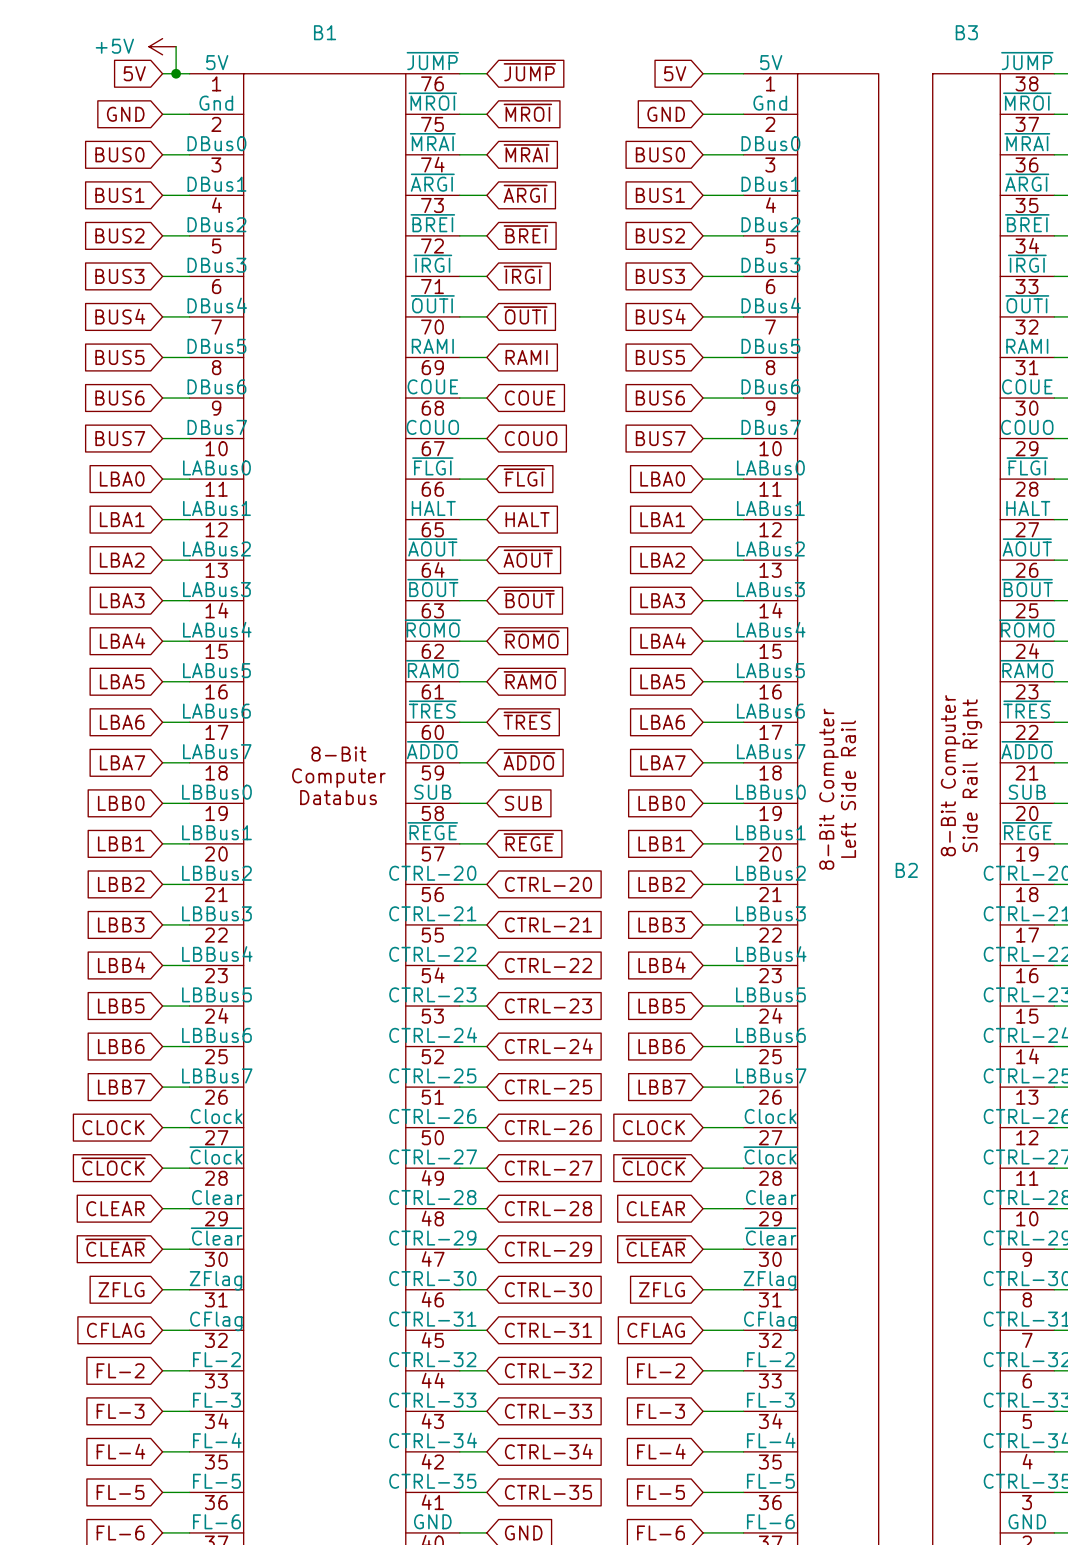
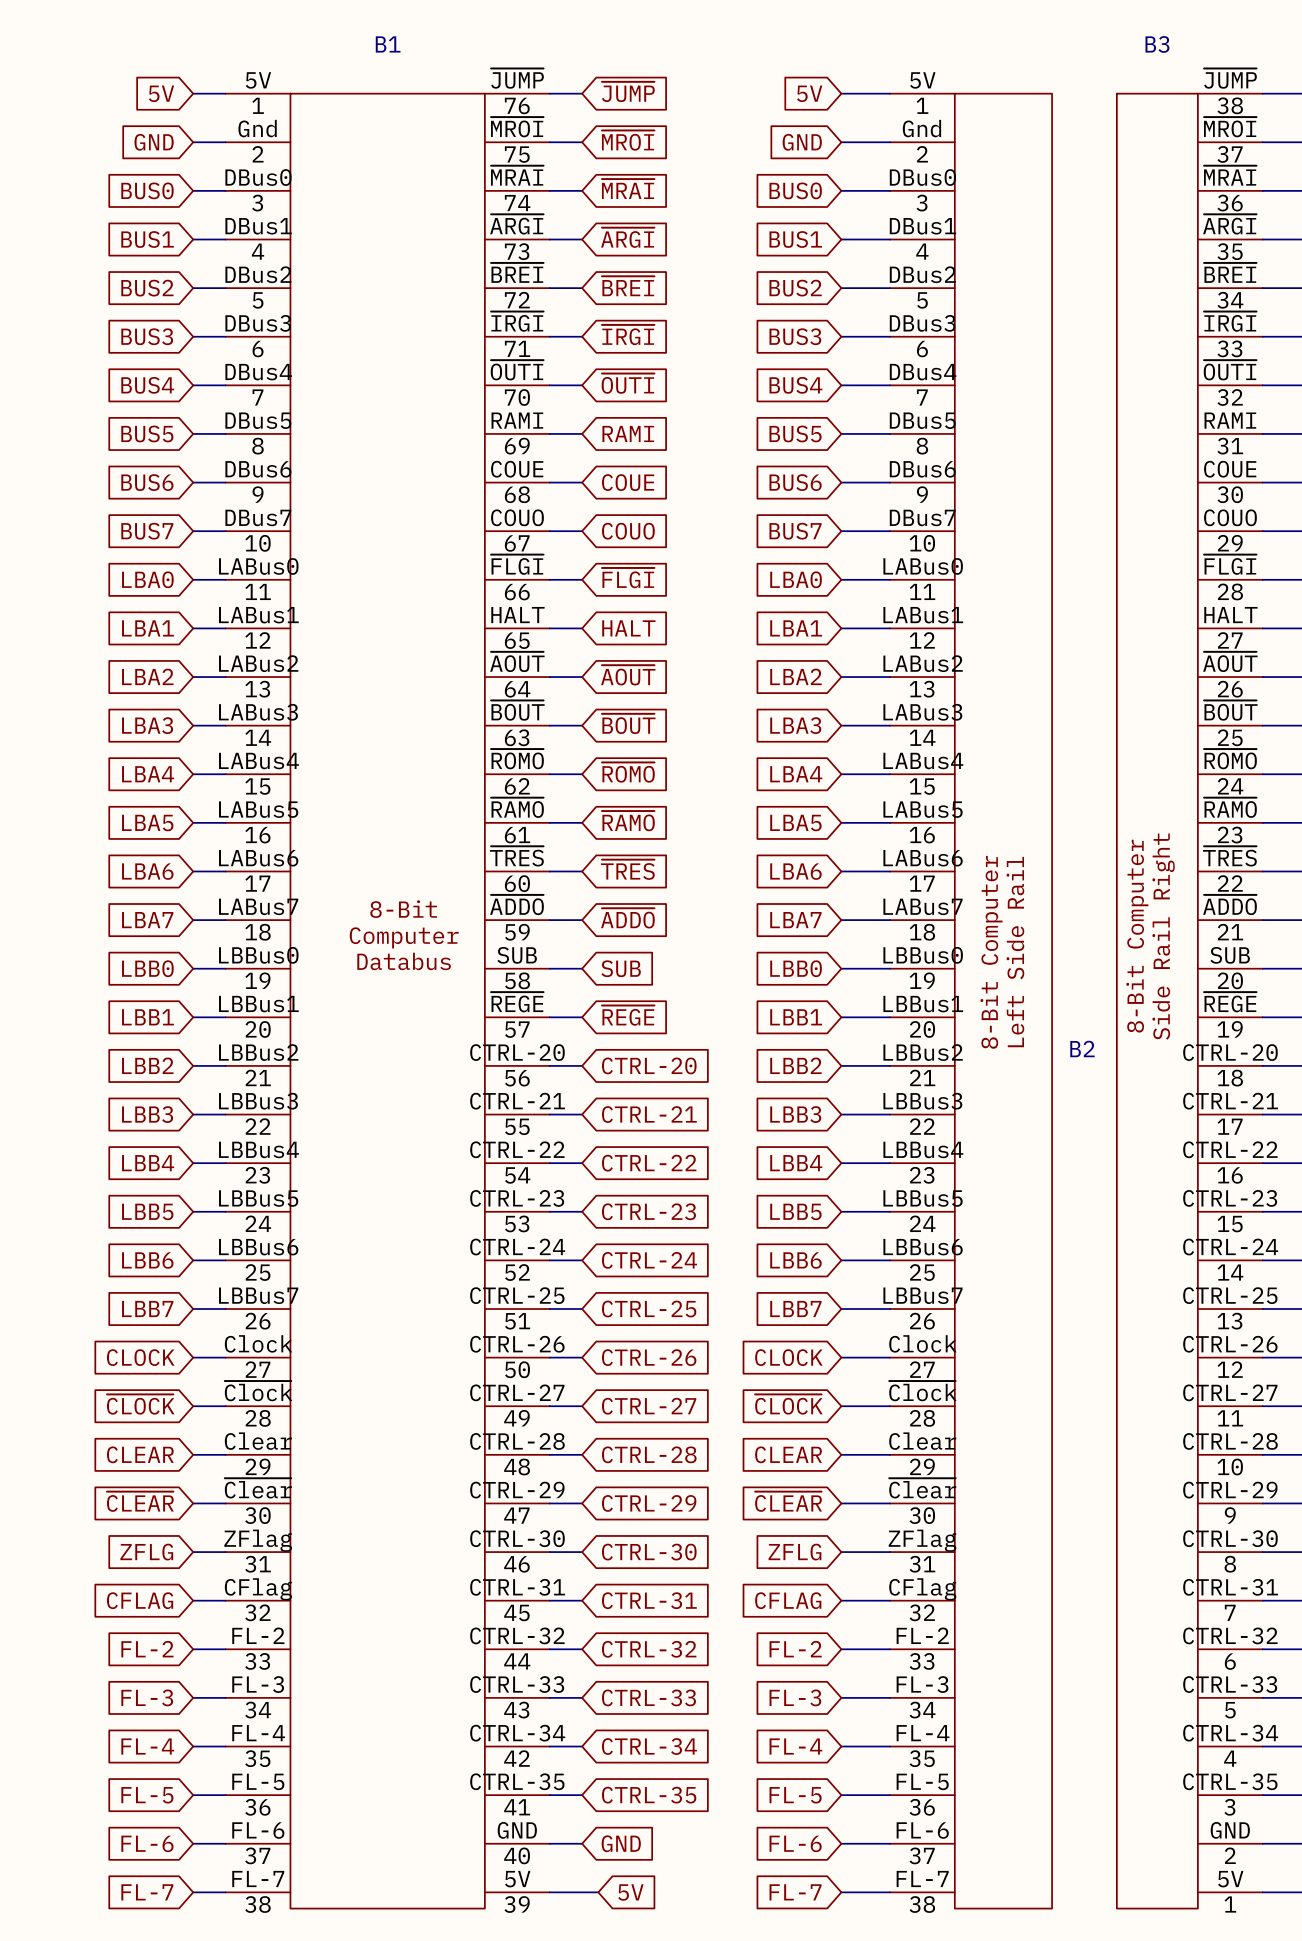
power symbol: +5V (162, 46) -> none
wire: (176, 46) (176, 73) -> none
junction: (176, 73) -> none

